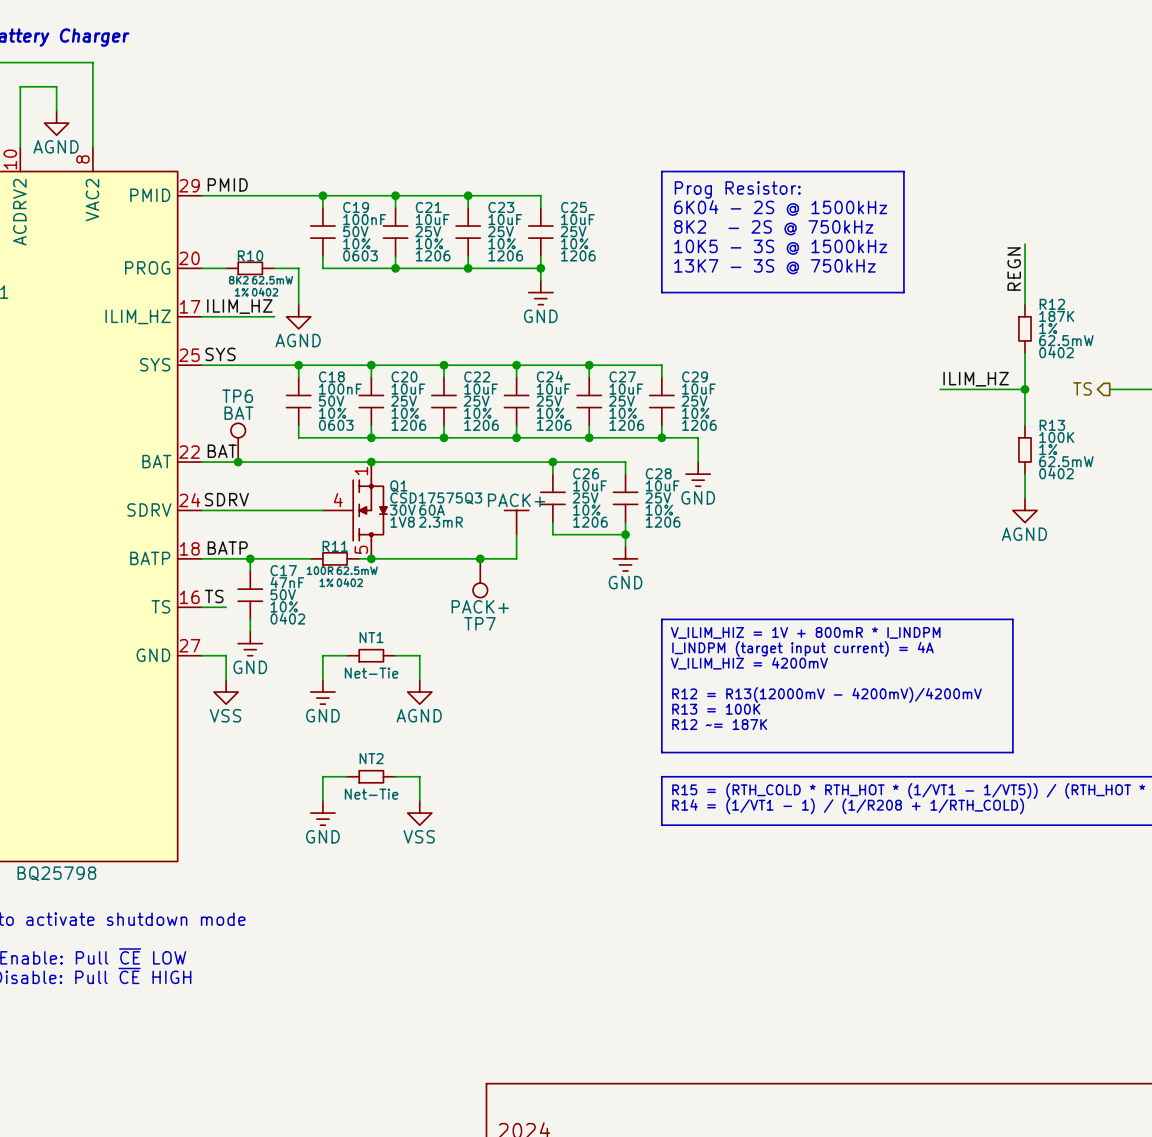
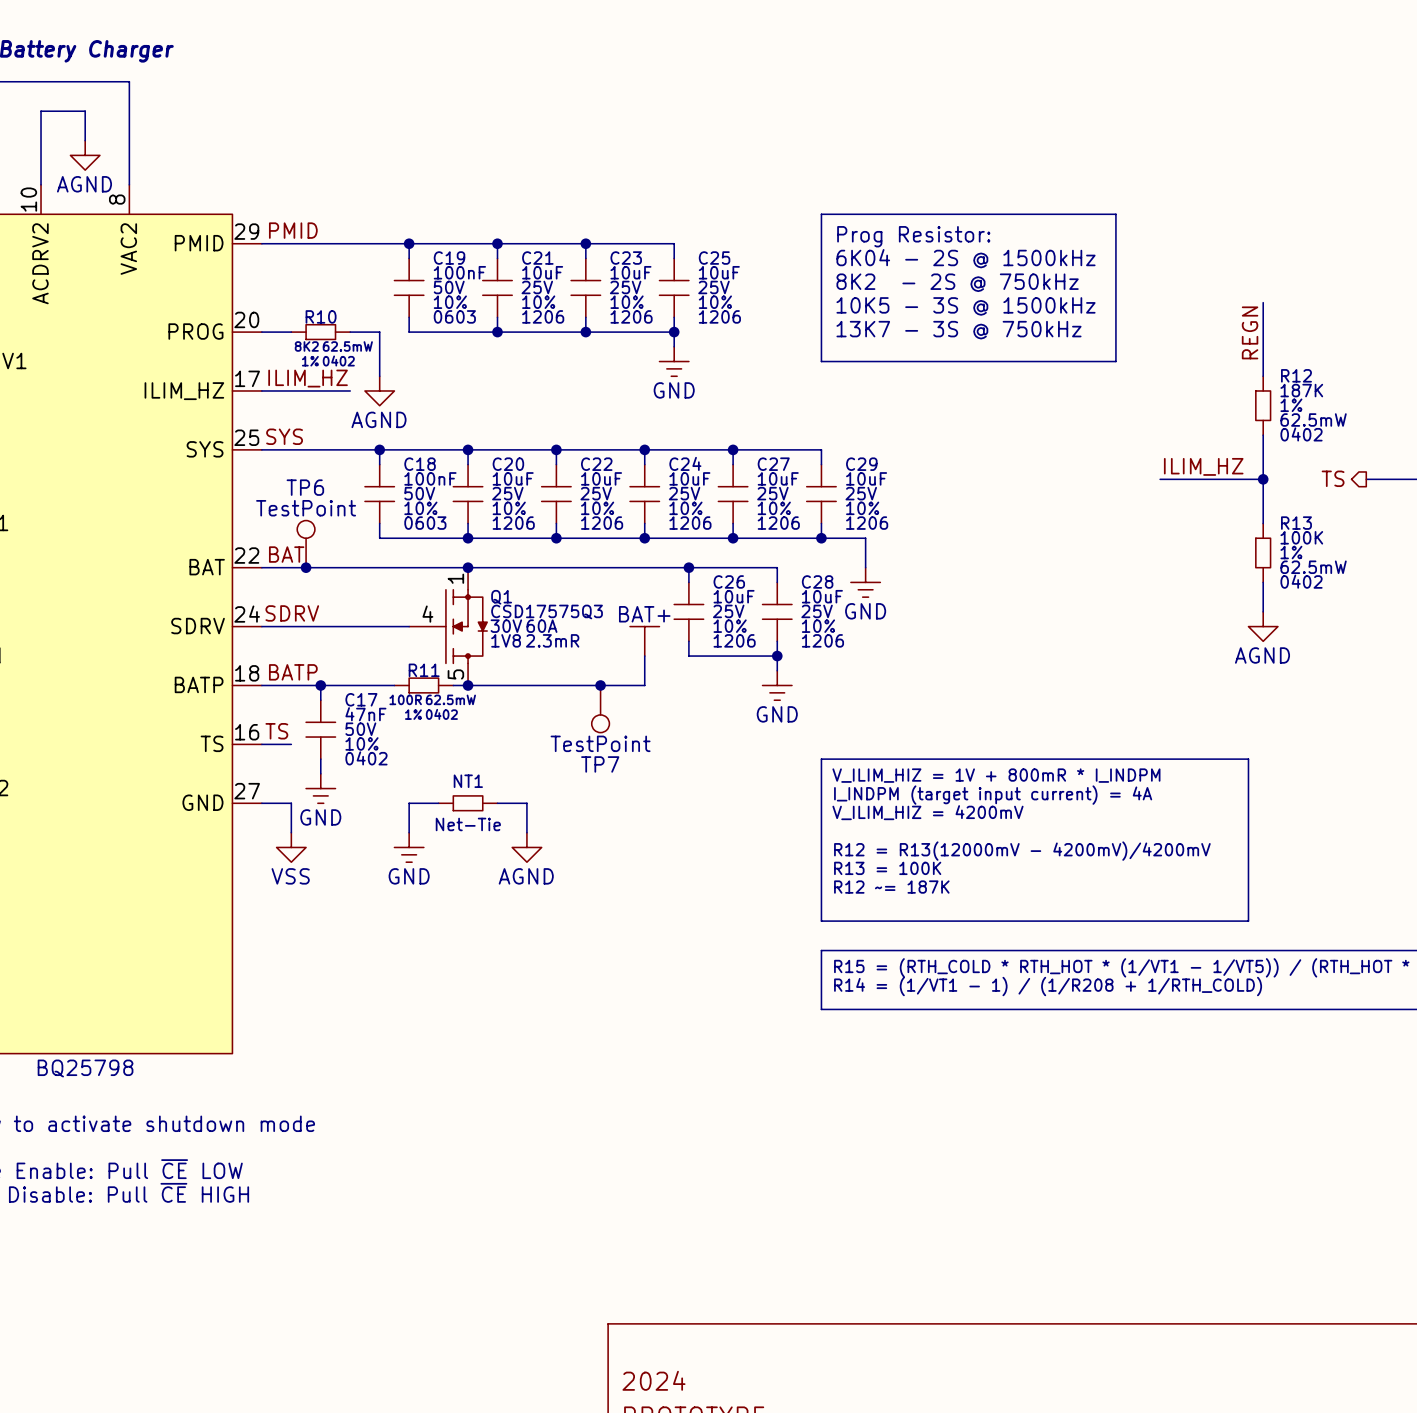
TP6 value: BAT (239, 413) -> TestPoint (306, 508)
power symbol: PACK+ (516, 522) -> BAT+ (644, 641)
TP7 value: PACK+ (480, 606) -> TestPoint (600, 743)
wire: (347, 776) (322, 776) (322, 800) -> none
NT2: Net-Tie (371, 776) -> none
wire: (395, 776) (419, 776) (419, 800) -> none
power symbol: GND (322, 813) -> none
power symbol: VSS (419, 813) -> none

